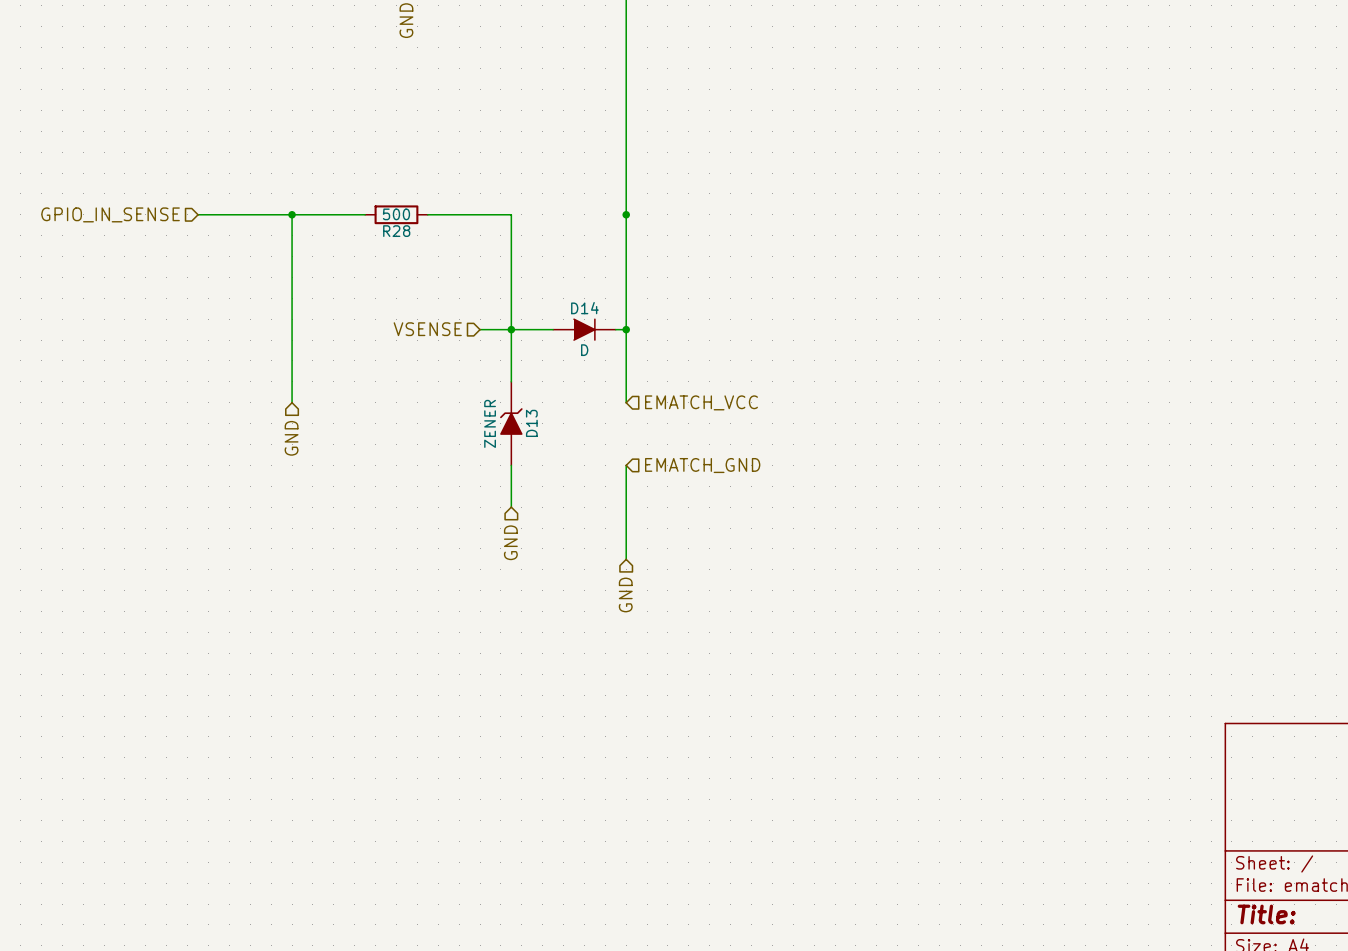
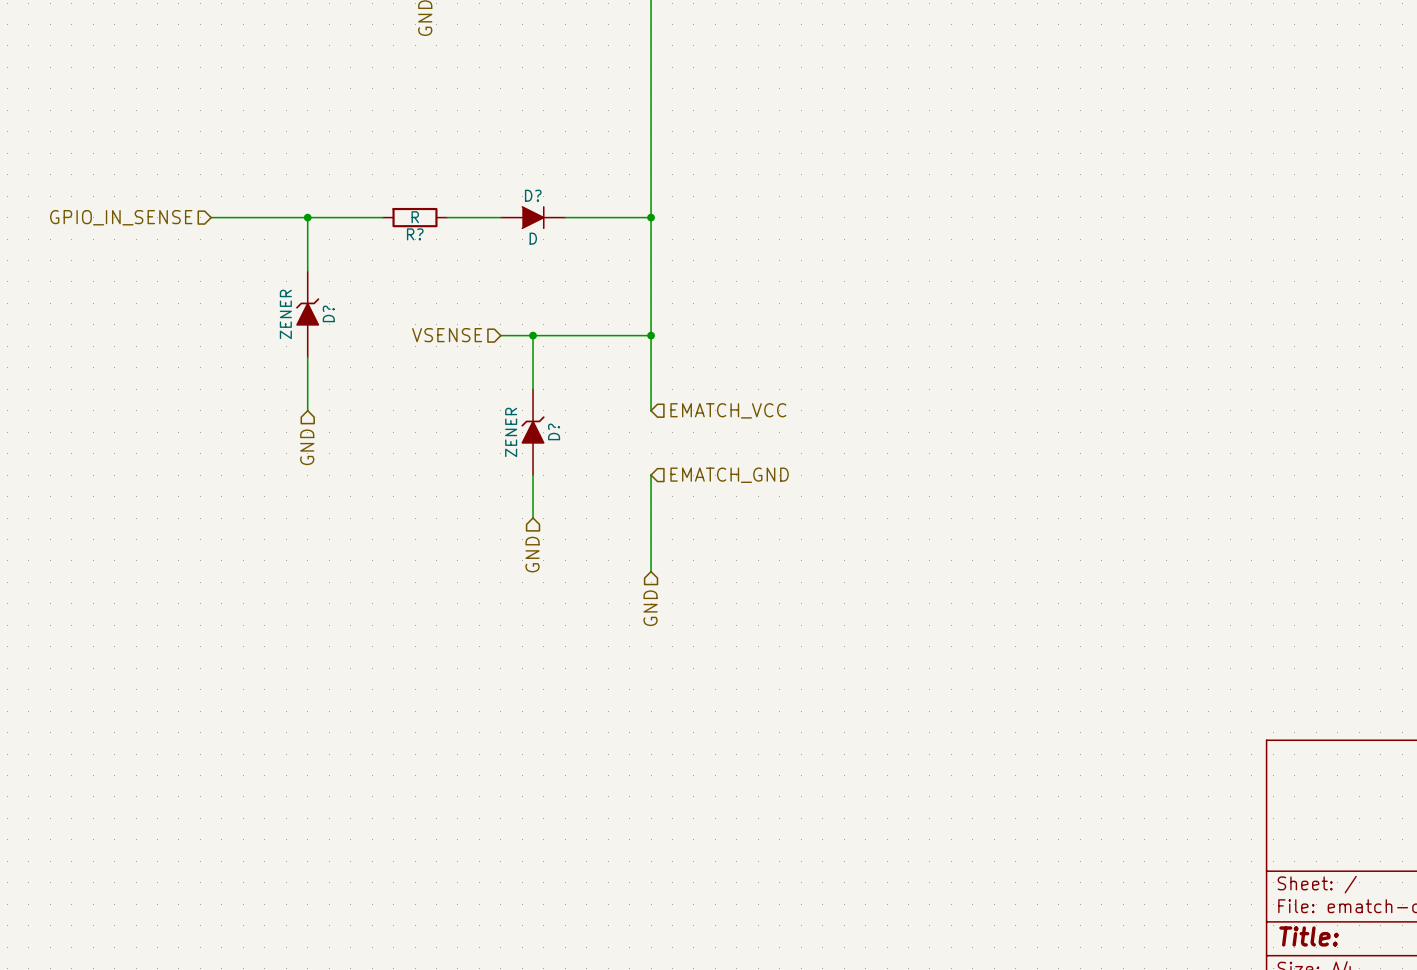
R28 value: 500 (396, 214) -> R (415, 217)
wire: (480, 214) (511, 214) (511, 329) -> none
D?: none -> D (533, 217)
wire: none -> (565, 217) (651, 217)
R28 name: R28 (396, 231) -> R? (415, 234)
D?: none -> ZENER (307, 314)
D14: D (584, 329) -> none
D13 name: D13 (531, 423) -> D? (554, 431)

